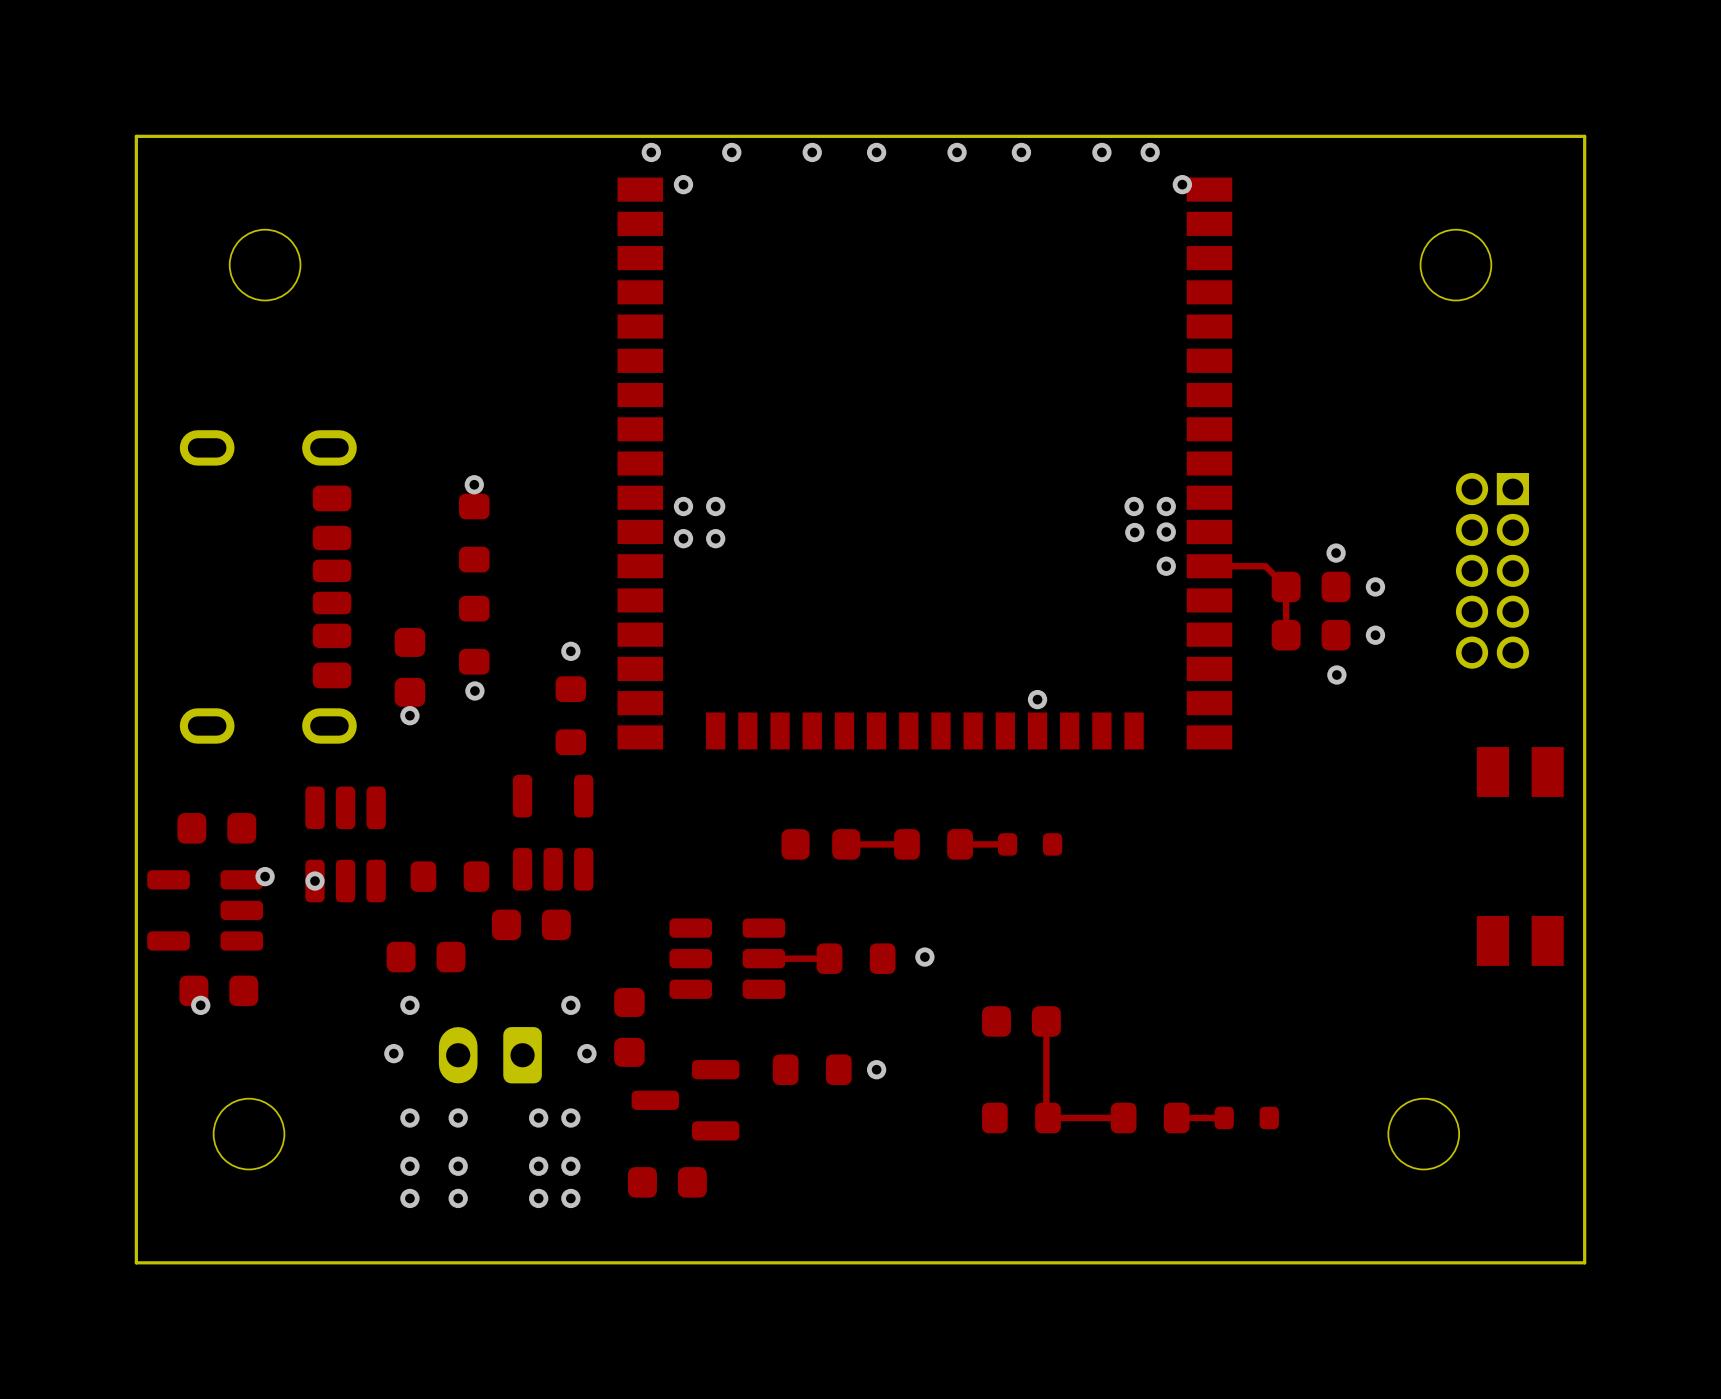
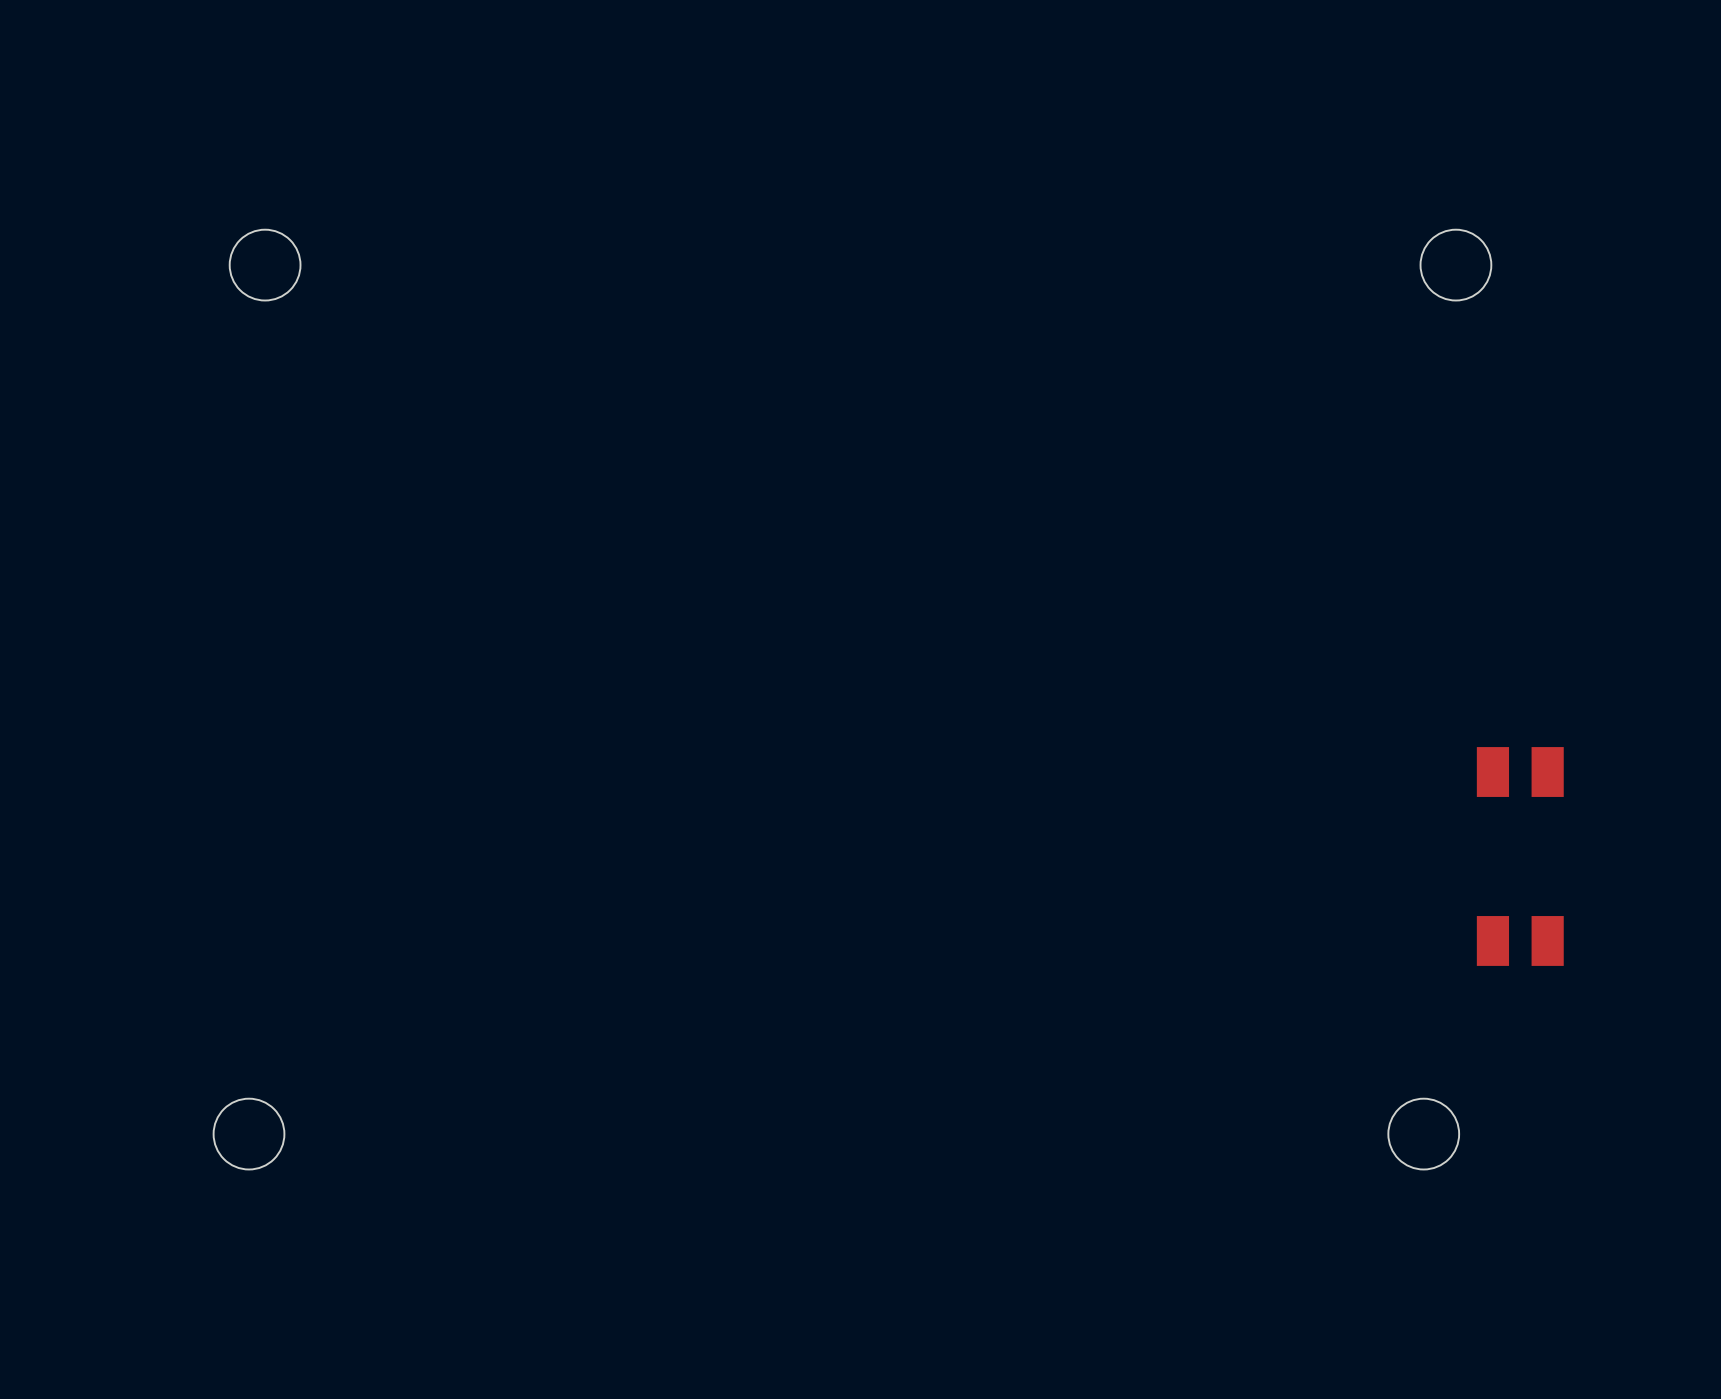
board edge: (1584, 136) (136, 136) (136, 1262) (1584, 1262) (1584, 136) -> none
via: (651, 152) -> none
via: (731, 152) -> none
via: (812, 152) -> none
via: (876, 152) -> none
via: (957, 152) -> none
via: (1021, 152) -> none
via: (1101, 152) -> none
via: (1150, 152) -> none
via: (683, 184) -> none
via: (1182, 184) -> none
part: (924, 463) -> none
via: (474, 484) -> none
via: (683, 506) -> none
via: (715, 506) -> none
via: (1134, 506) -> none
via: (1166, 506) -> none
via: (1166, 531) -> none
via: (1134, 532) -> none
part: (474, 533) -> none
via: (683, 538) -> none
via: (715, 538) -> none
via: (1336, 553) -> none
via: (1166, 566) -> none
top track: (1209, 566) (1265, 566) (1286, 586) (1286, 635) -> none
part: (1492, 570) -> none
part: (268, 586) -> none
part: (1311, 586) -> none
via: (1375, 586) -> none
part: (474, 635) -> none
part: (1311, 635) -> none
via: (1375, 635) -> none
via: (570, 651) -> none
part: (409, 667) -> none
via: (1336, 674) -> none
via: (474, 690) -> none
via: (1037, 699) -> none
via: (409, 715) -> none
part: (570, 715) -> none
part: (216, 828) -> none
part: (553, 832) -> none
part: (345, 844) -> none
part: (820, 844) -> none
top track: (906, 844) (846, 844) -> none
part: (933, 844) -> none
top track: (1007, 844) (960, 844) -> none
part: (1030, 844) -> none
via: (265, 876) -> none
part: (449, 876) -> none
via: (314, 881) -> none
part: (205, 910) -> none
part: (531, 924) -> none
part: (426, 957) -> none
via: (924, 957) -> none
part: (727, 958) -> none
top track: (829, 958) (763, 958) -> none
part: (856, 958) -> none
part: (218, 990) -> none
via: (200, 1005) -> none
via: (409, 1005) -> none
via: (570, 1005) -> none
part: (1021, 1021) -> none
top track: (1046, 1021) (1046, 1116) (1047, 1117) (1123, 1117) -> none
part: (629, 1027) -> none
via: (393, 1053) -> none
via: (586, 1053) -> none
part: (490, 1055) -> none
part: (812, 1069) -> none
via: (876, 1069) -> none
part: (685, 1100) -> none
via: (409, 1117) -> none
via: (458, 1117) -> none
via: (538, 1117) -> none
via: (570, 1117) -> none
part: (1021, 1117) -> none
part: (1150, 1117) -> none
top track: (1224, 1117) (1176, 1117) -> none
part: (1246, 1117) -> none
via: (409, 1166) -> none
via: (458, 1166) -> none
via: (538, 1166) -> none
via: (570, 1166) -> none
part: (667, 1182) -> none
via: (409, 1198) -> none
via: (458, 1198) -> none
via: (538, 1198) -> none
via: (570, 1198) -> none

